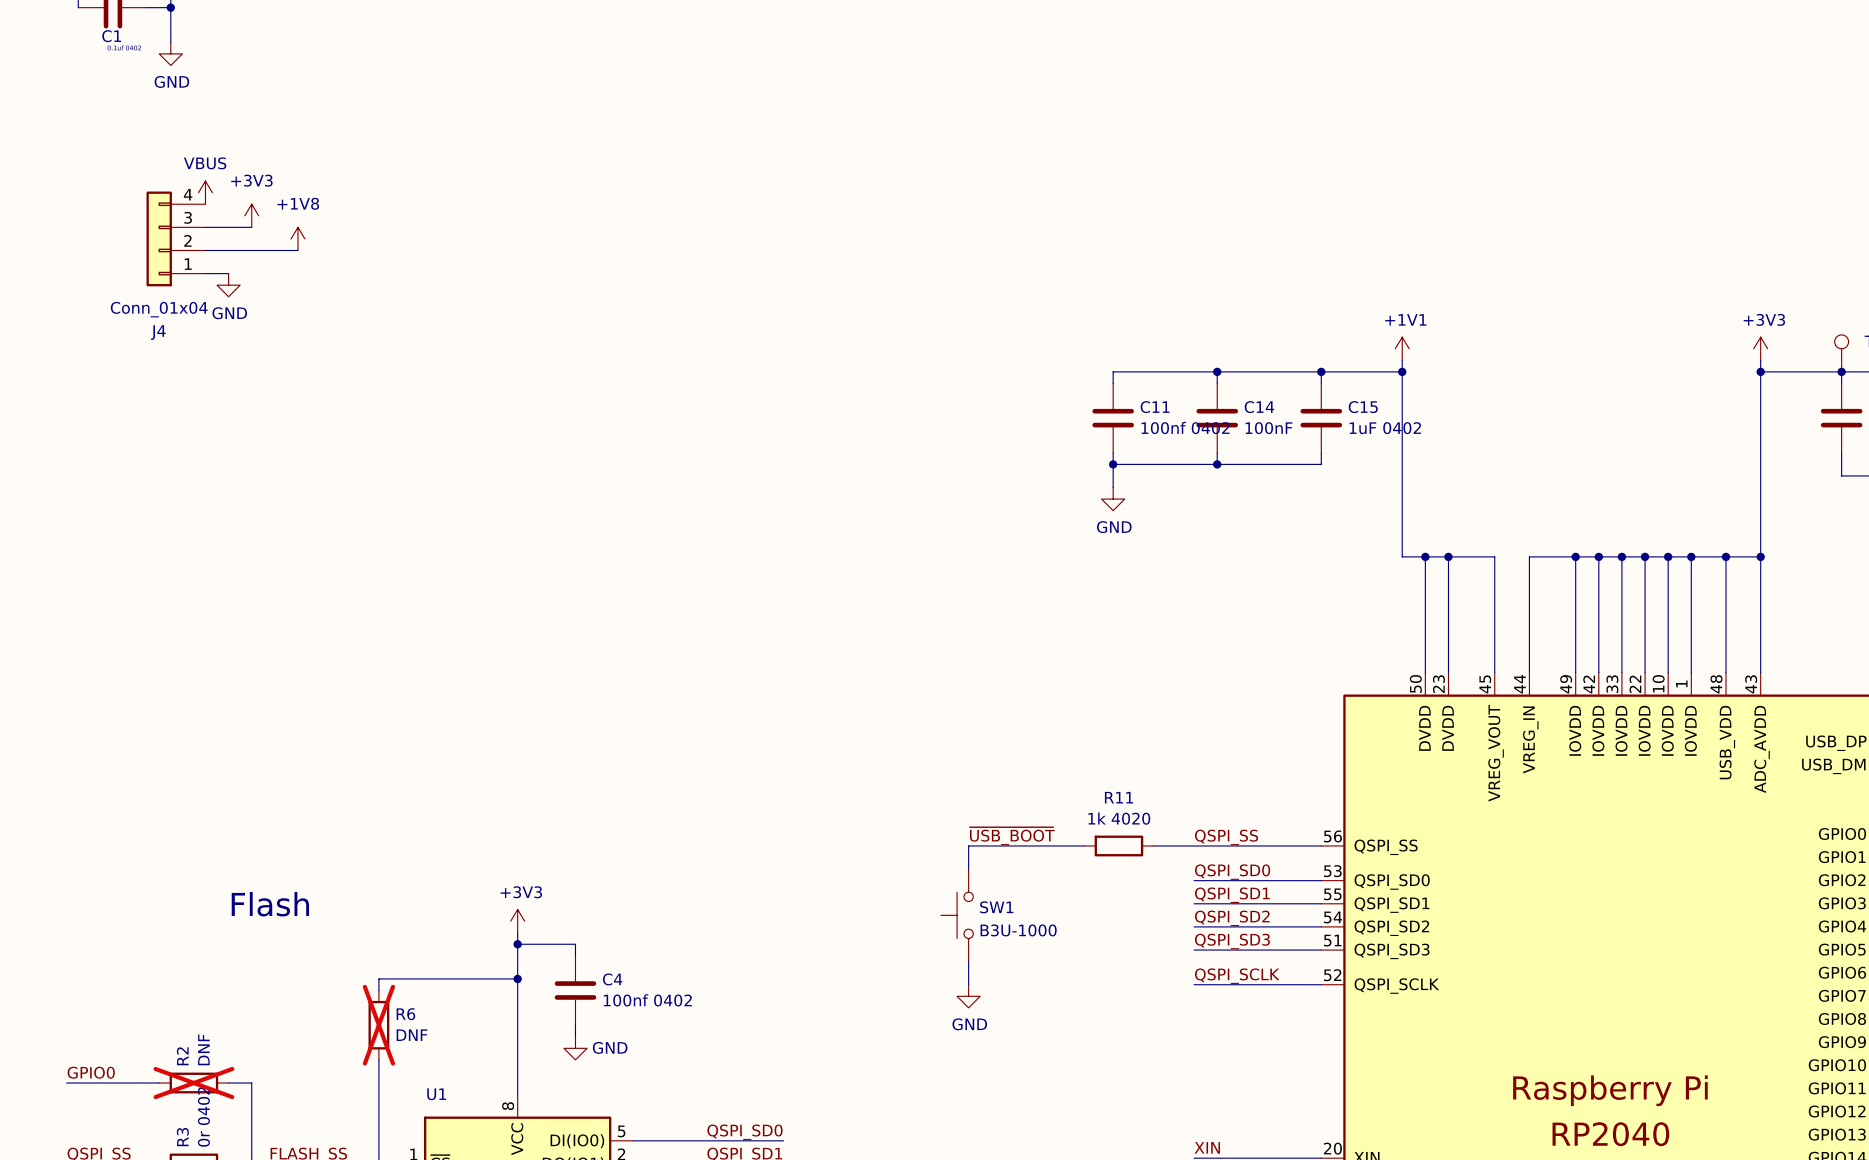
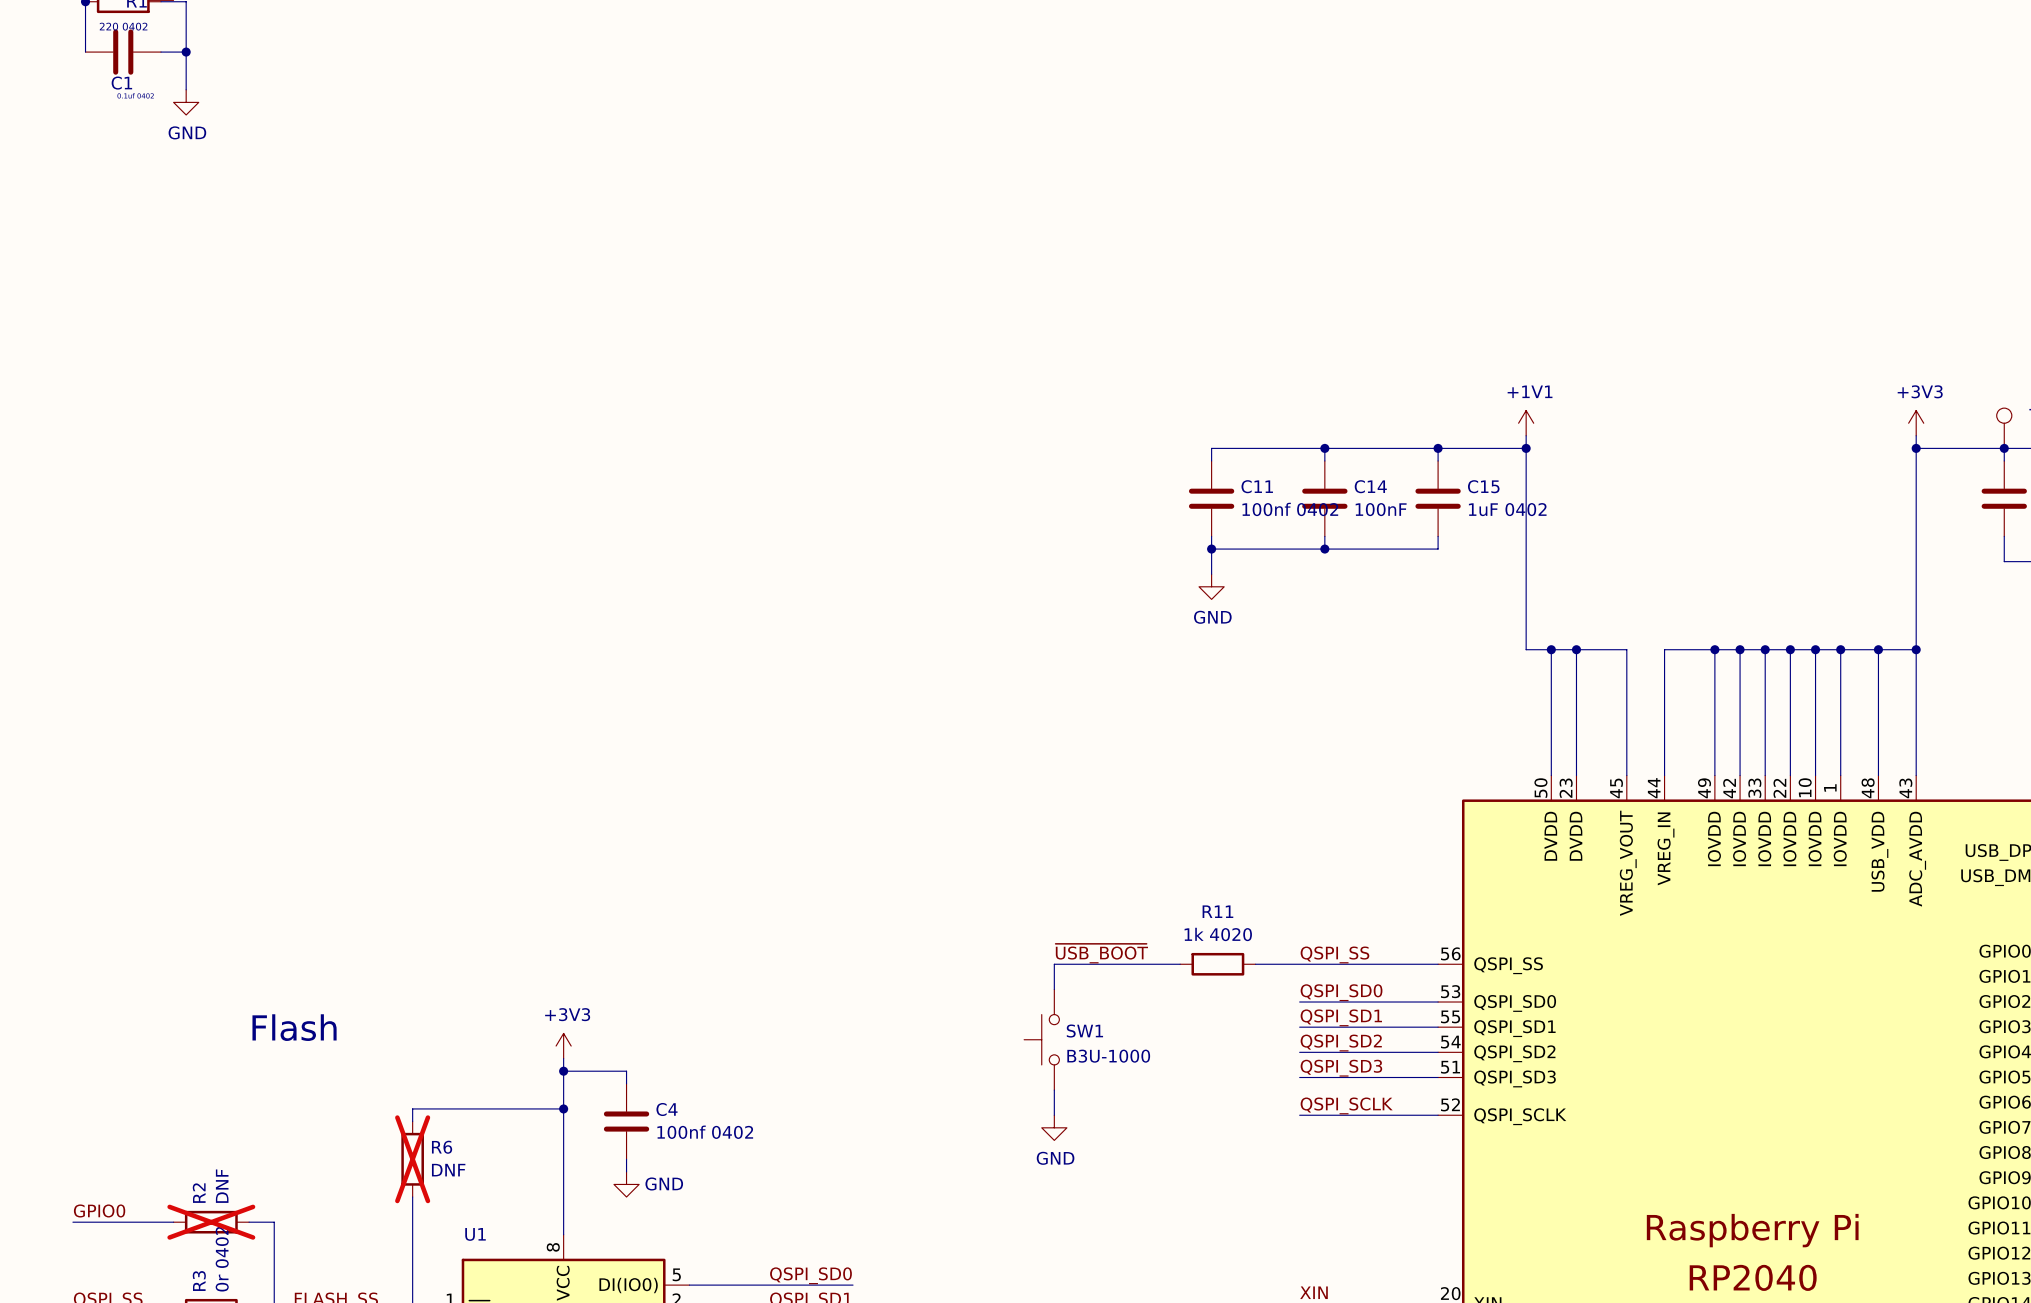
power symbol: VBUS (205, 192) -> none
power symbol: +3V3 (251, 215) -> none
wire: (205, 227) (251, 227) -> none
J4: Conn_01x04 (175, 238) -> none
power symbol: +1V8 (297, 238) -> none
wire: (205, 250) (297, 250) -> none
wire: (205, 273) (228, 273) -> none
power symbol: GND (228, 285) -> none

